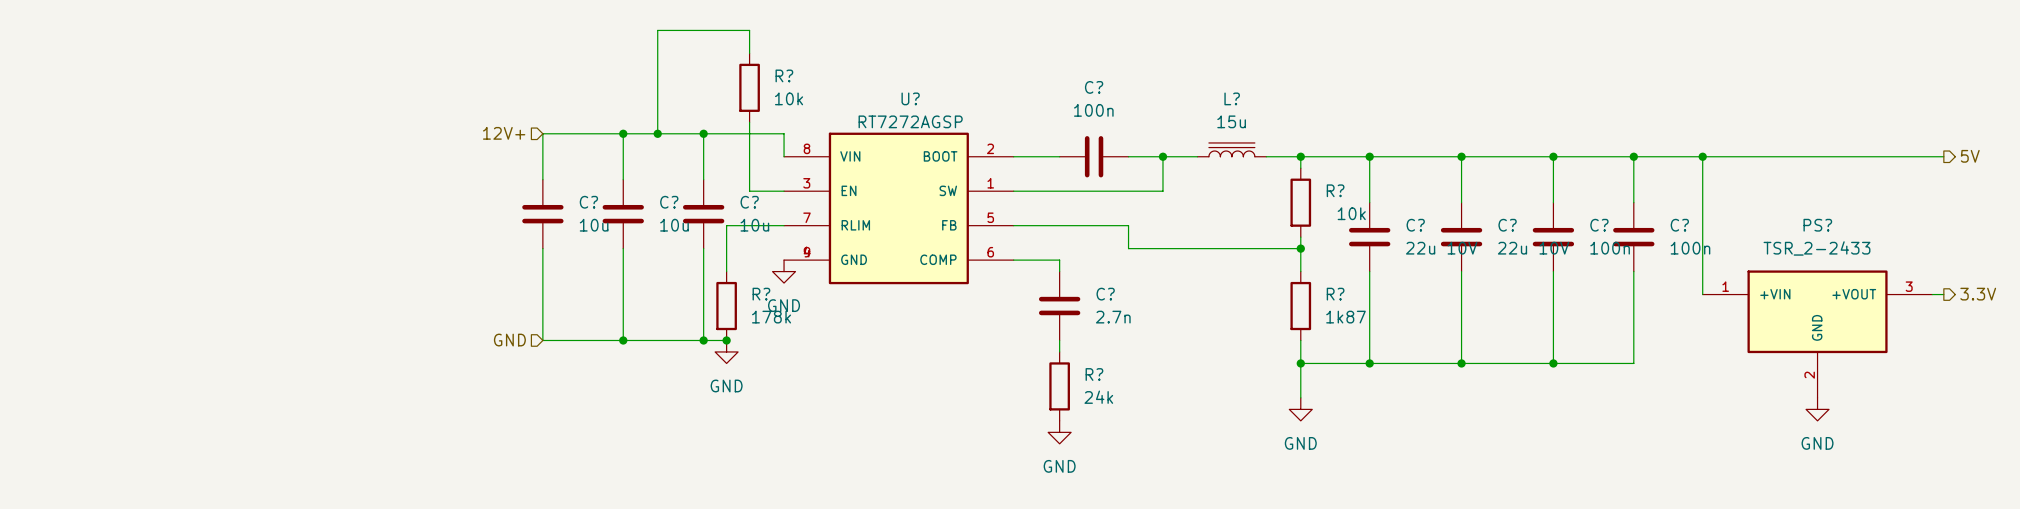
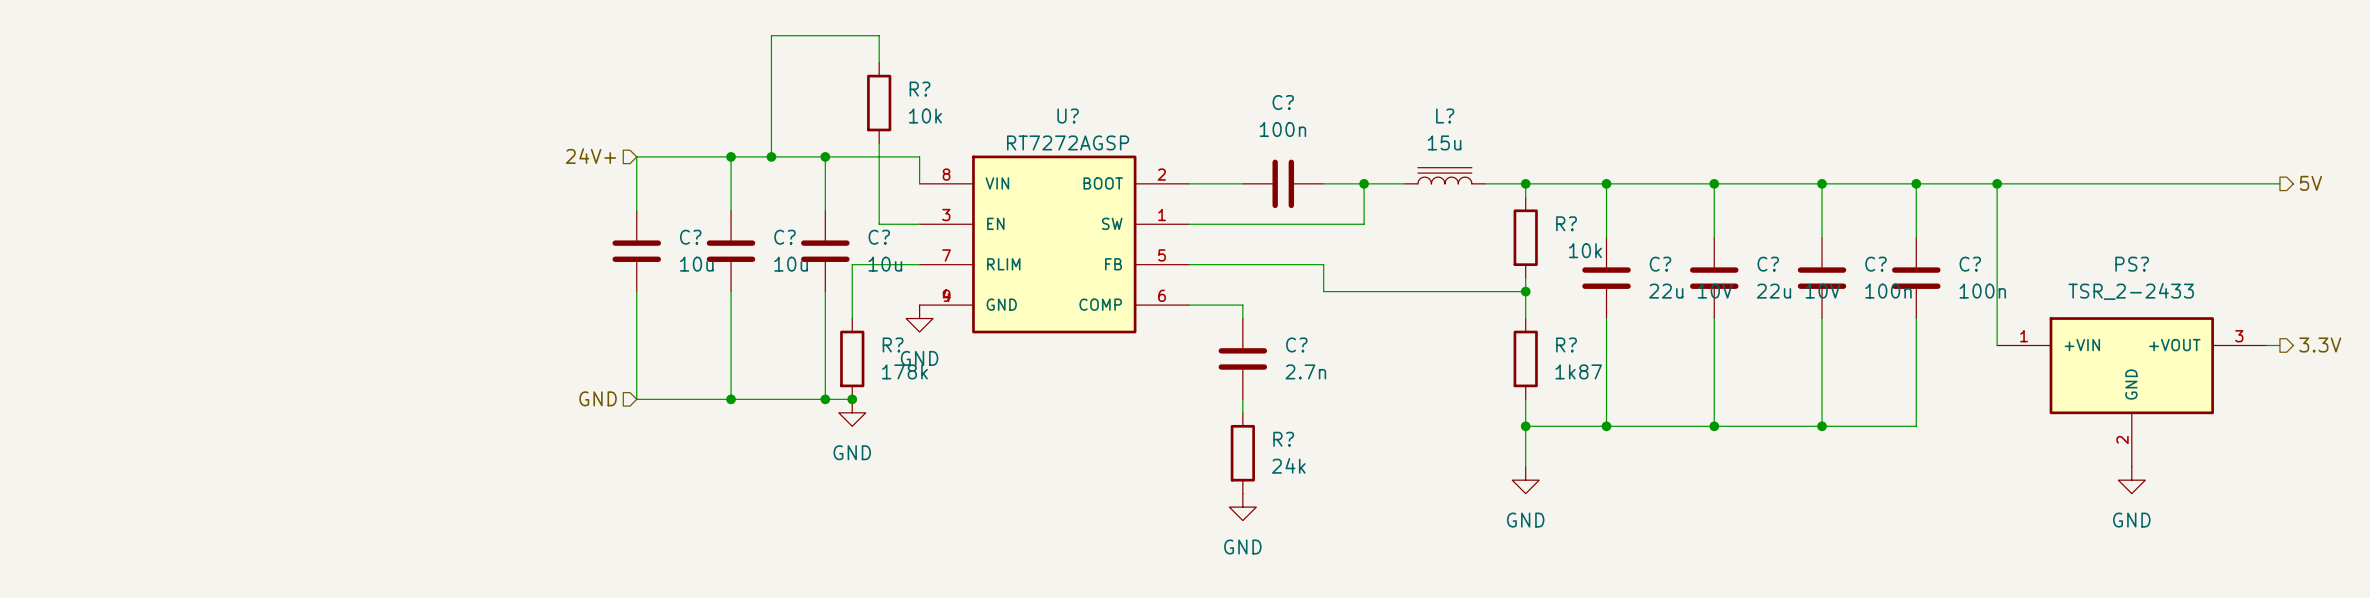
hierarchical label: 12V+ (504, 133) -> 24V+ (591, 156)

